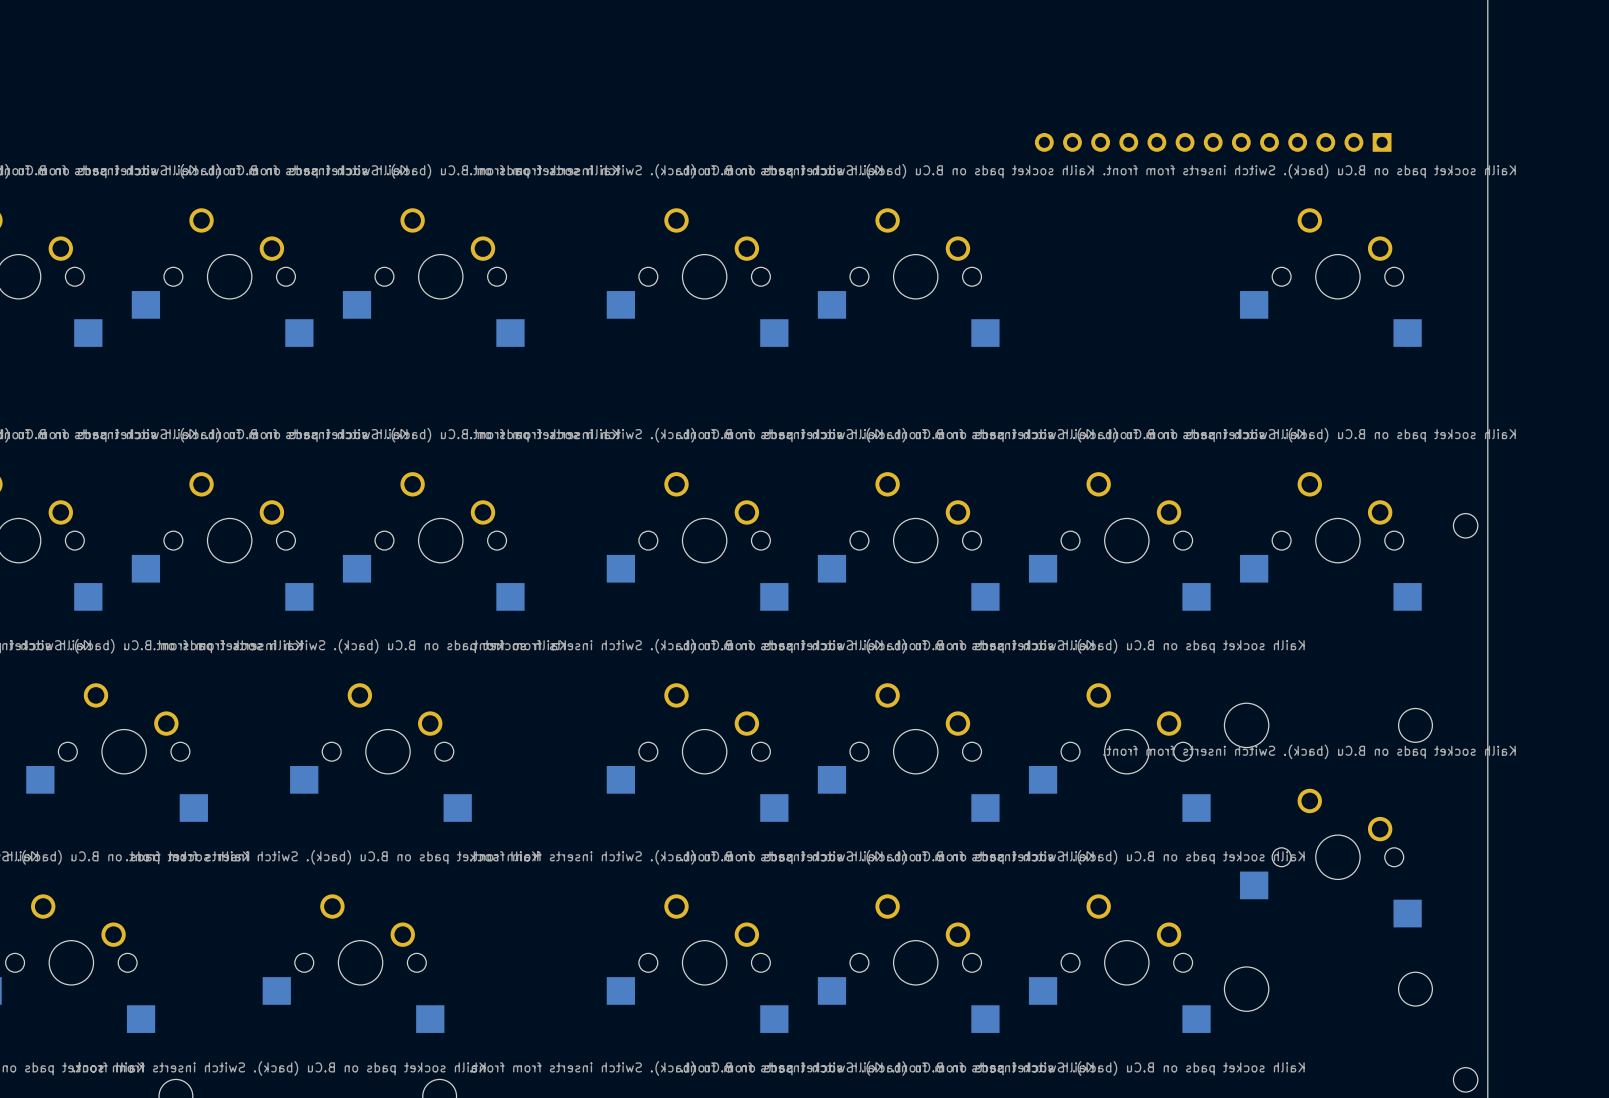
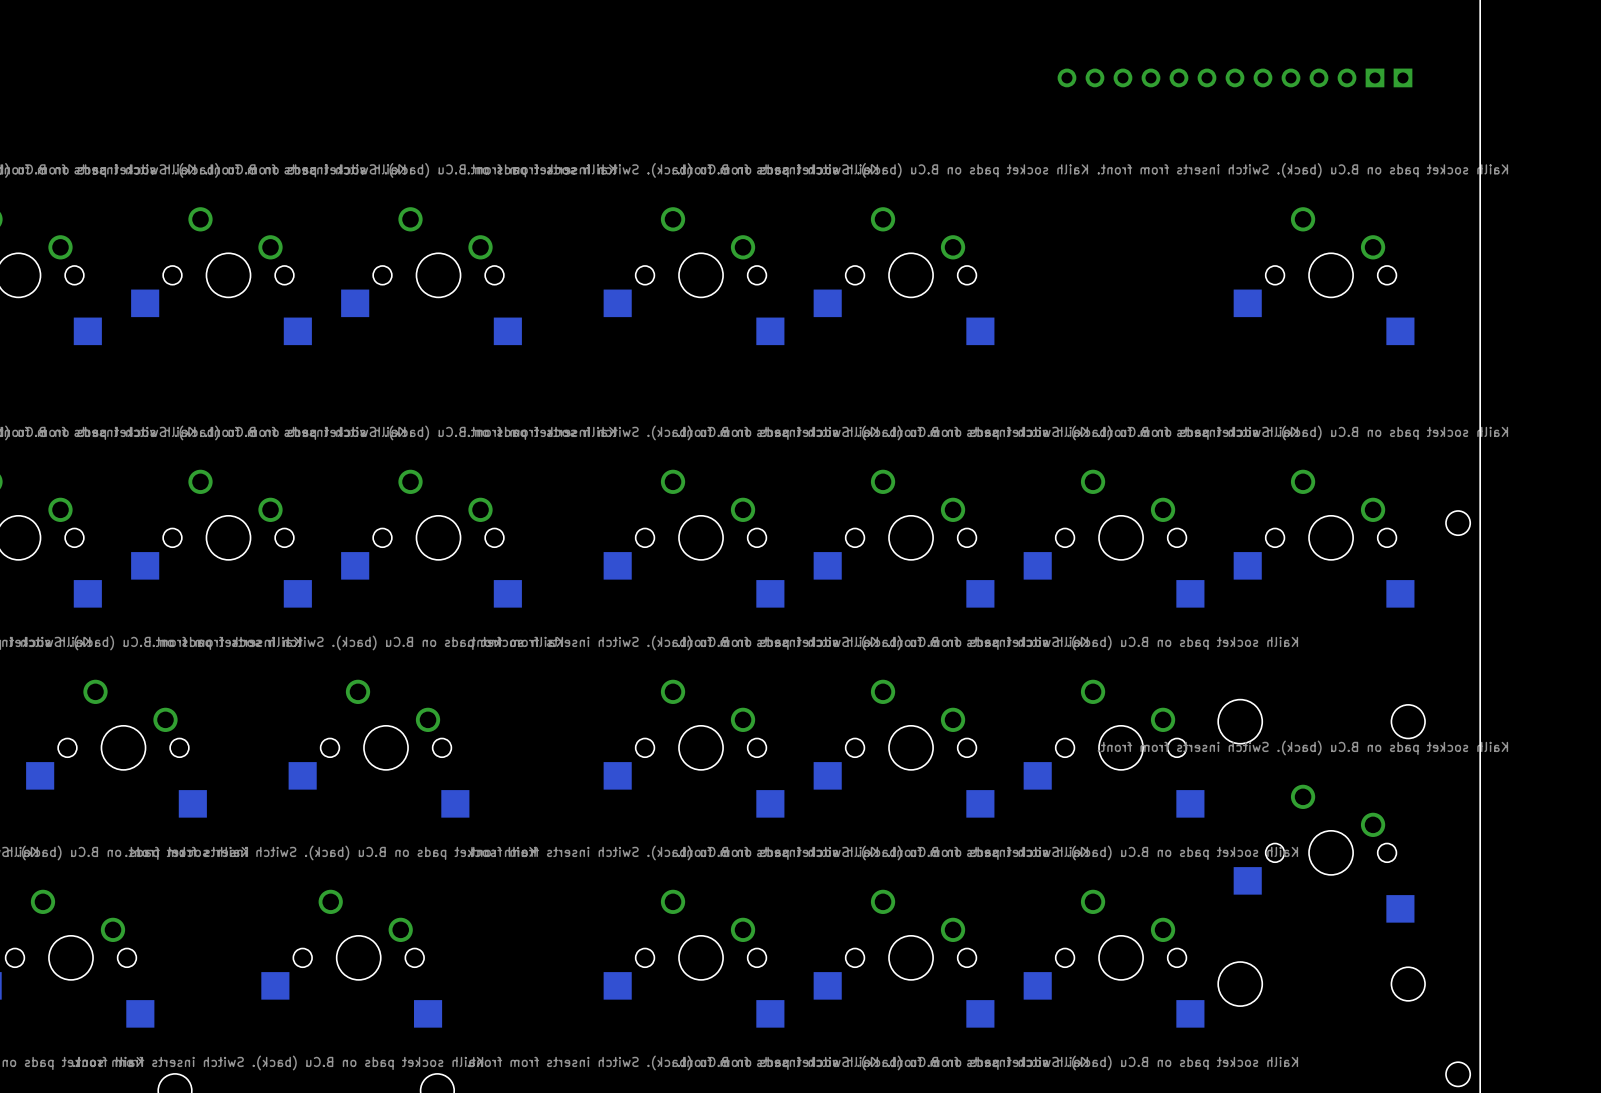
part: none -> (1234, 77)
part: (1213, 142) -> none

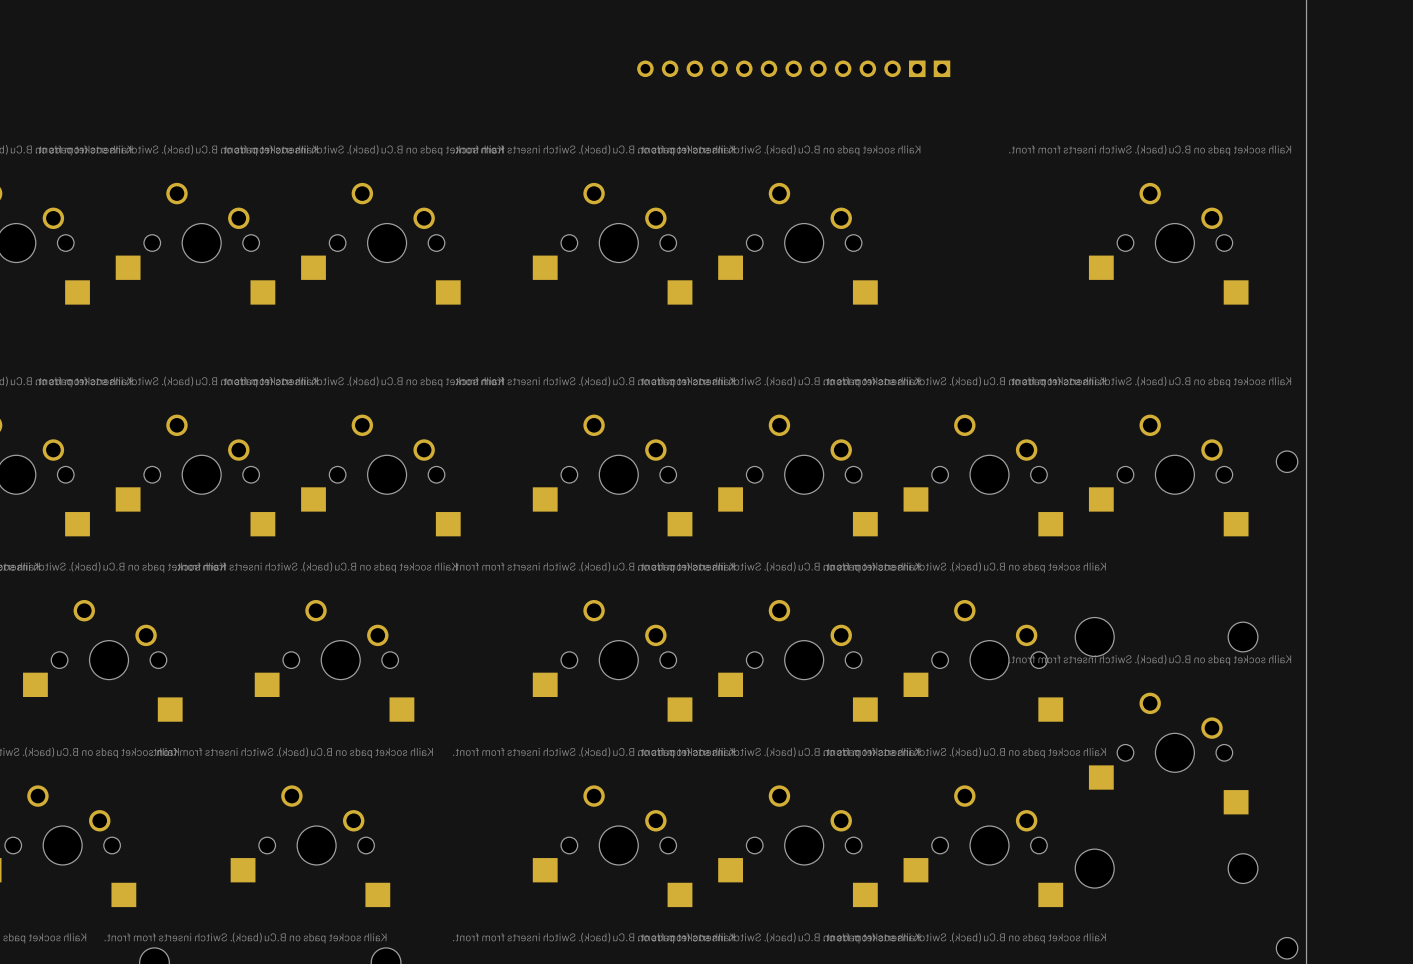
part: none -> (793, 68)
part: (1234, 77) -> none

